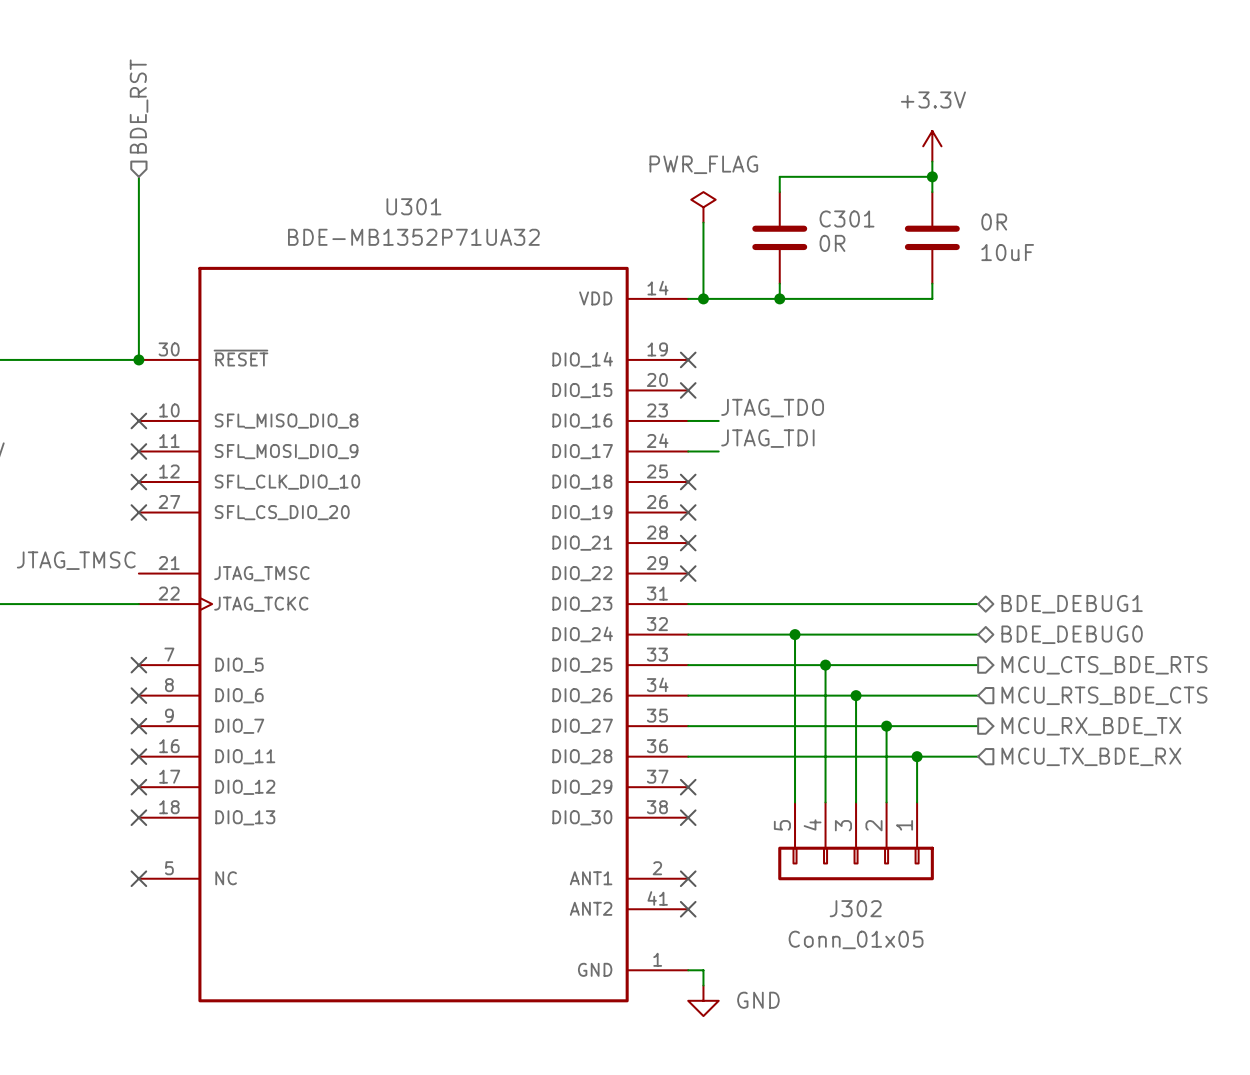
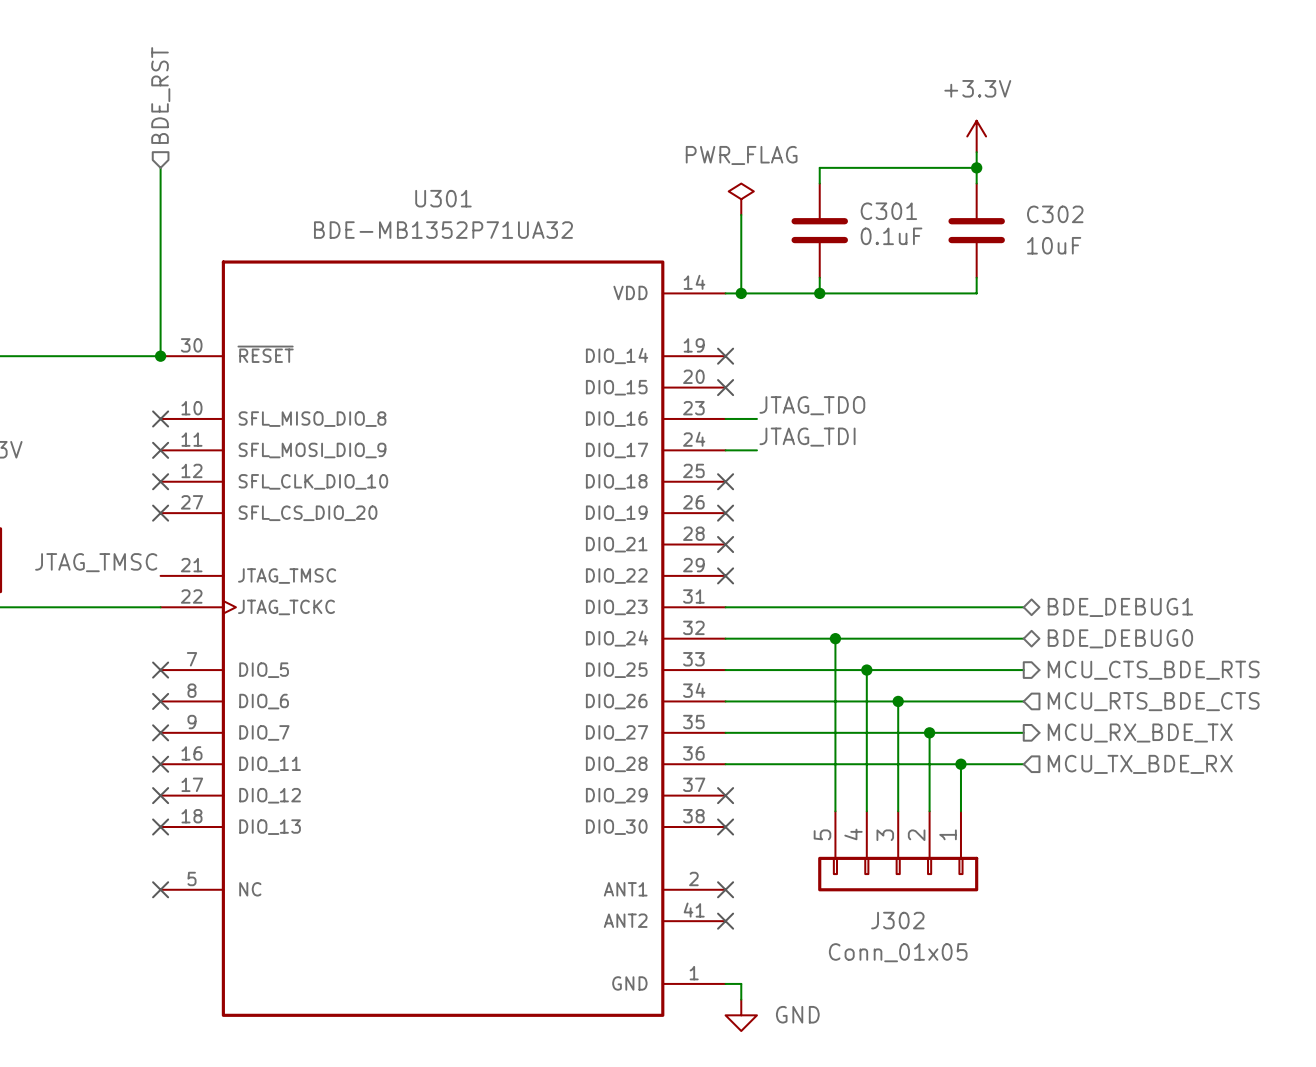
0R name: 0R (994, 222) -> C302 (1055, 214)
C301 value: 0R (832, 243) -> 0.1uF (891, 236)

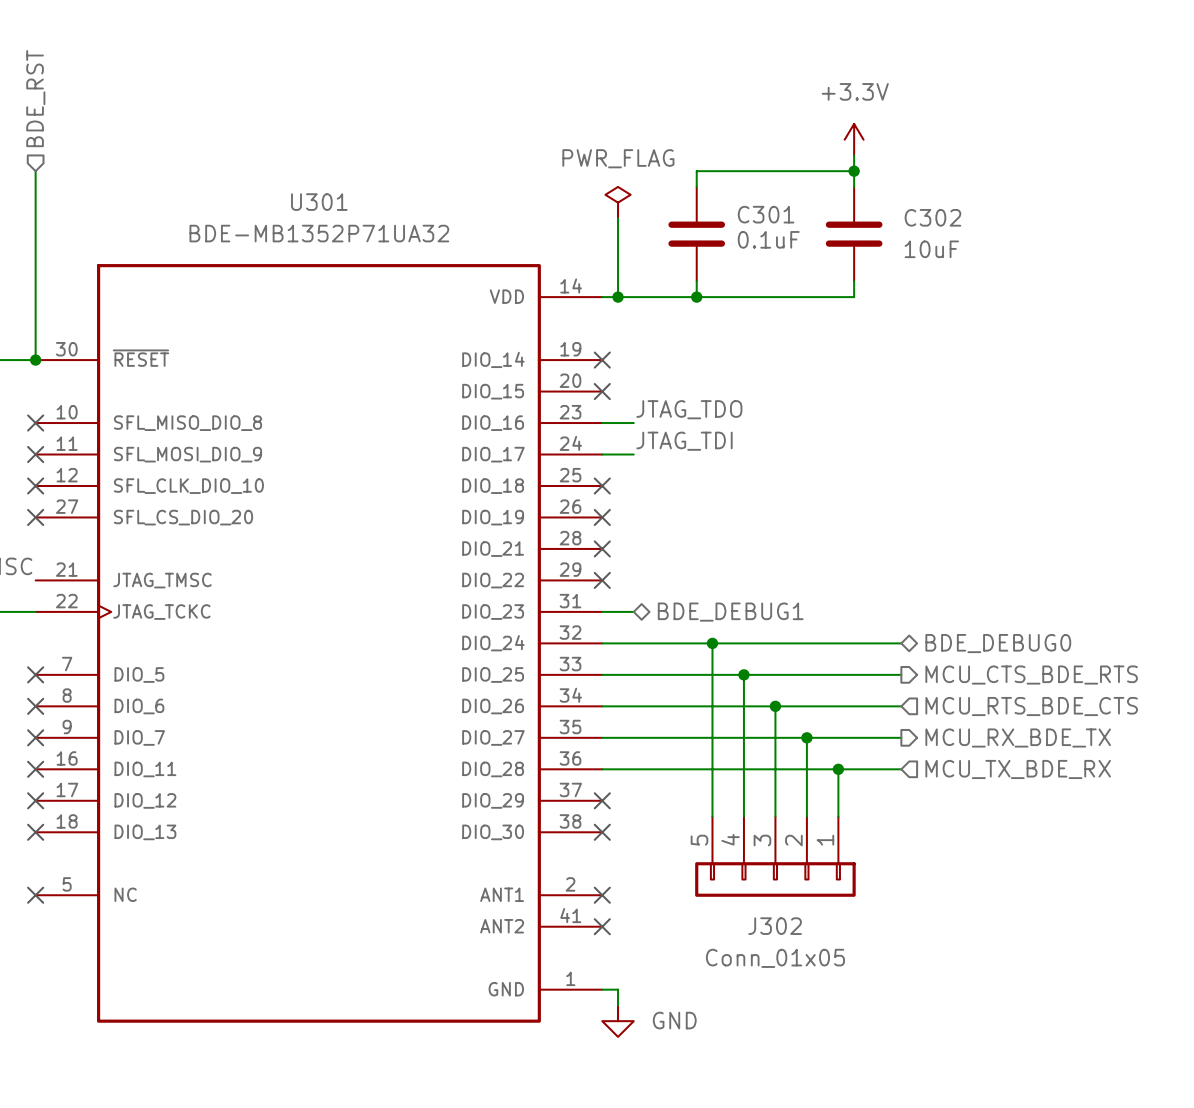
wire: (756, 607) (1023, 607) -> none
hierarchical label position: BDE_DEBUG1 (1120, 607) -> BDE_DEBUG1 (730, 612)

